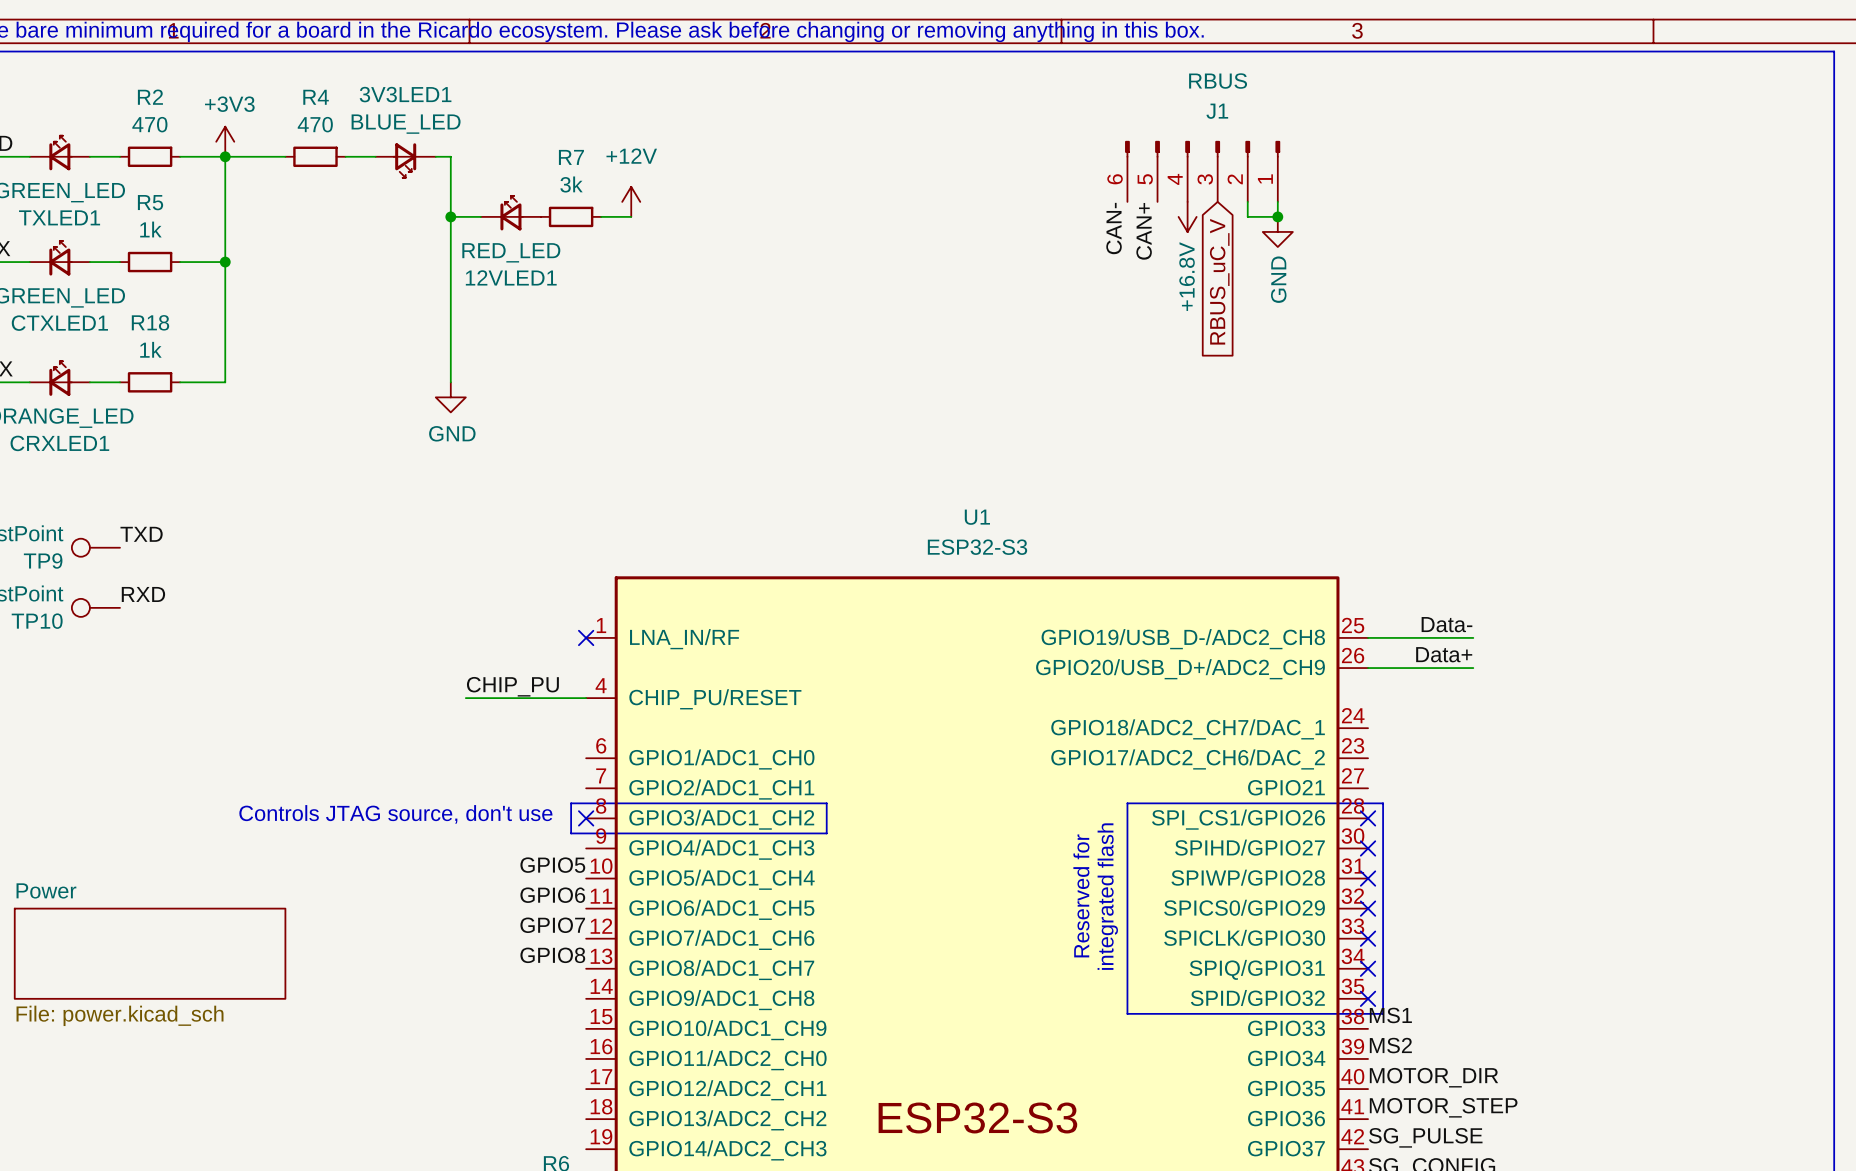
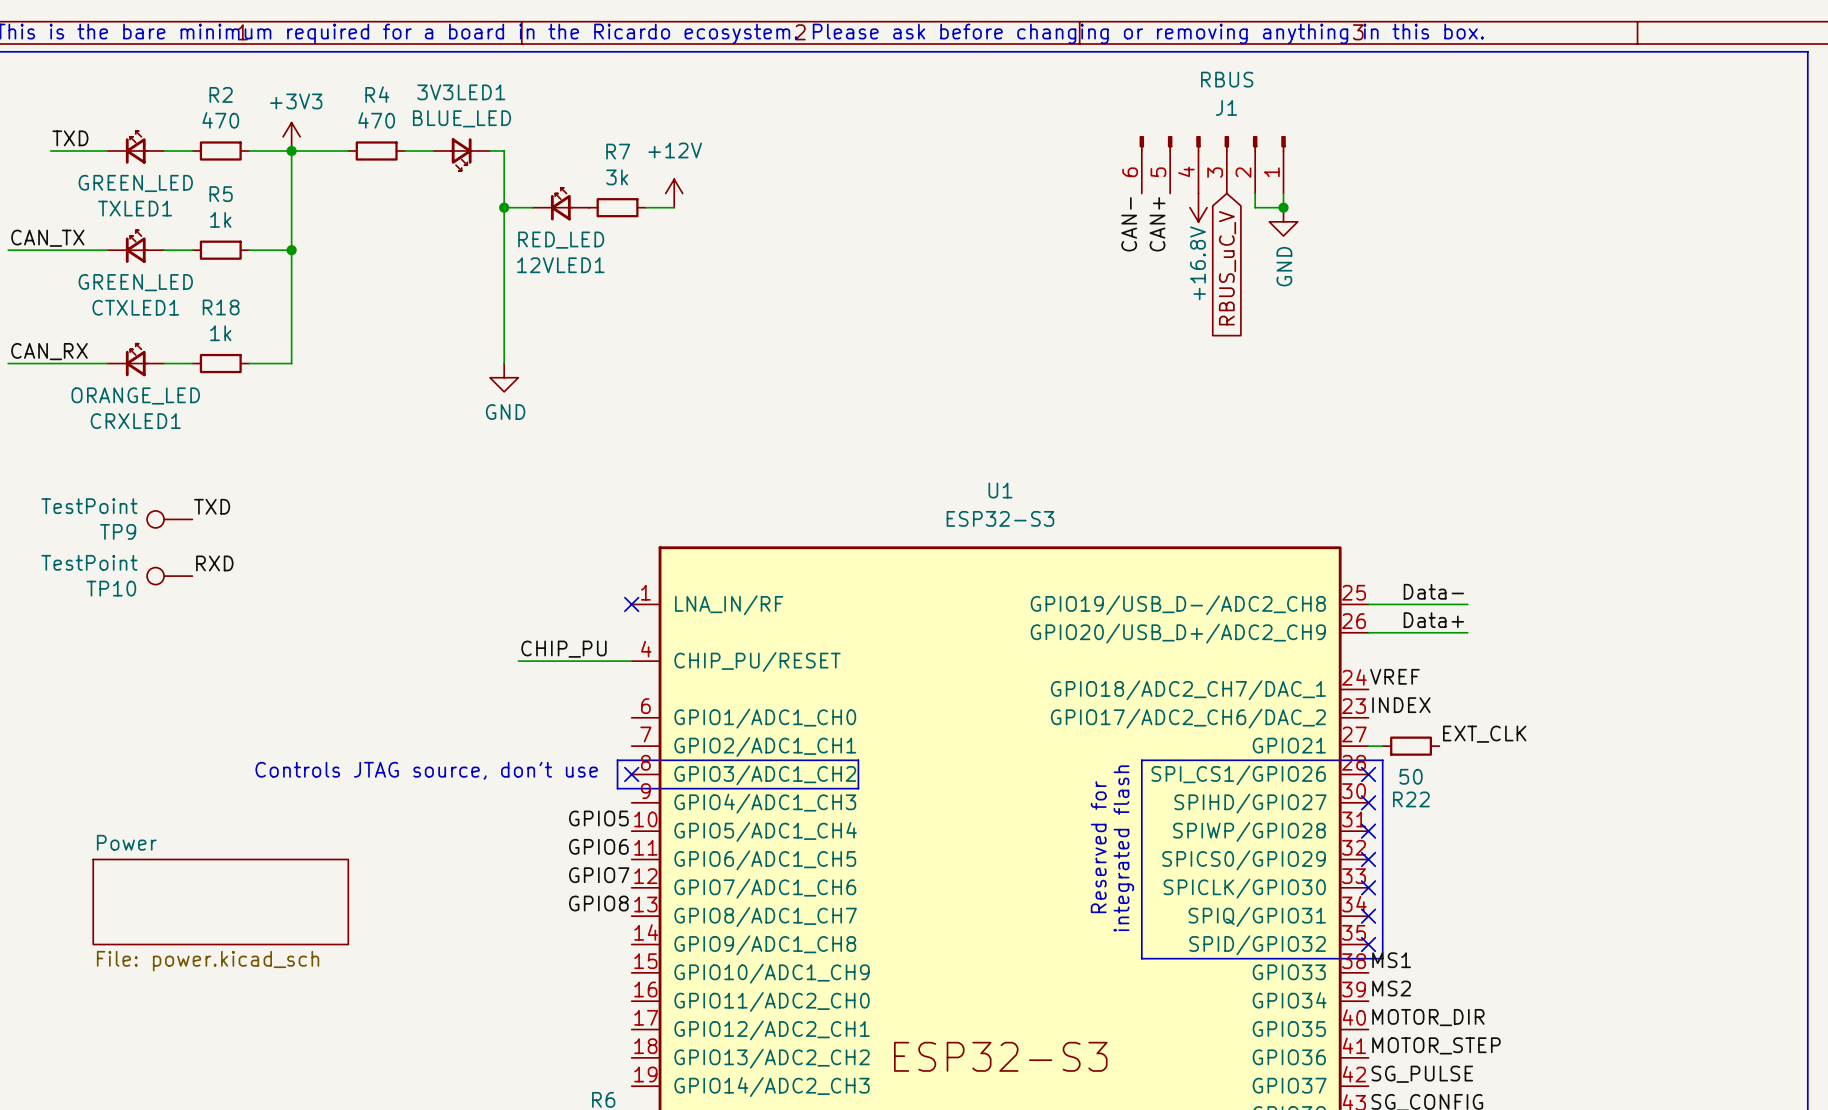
label: none -> VREF (1394, 676)
label: none -> INDEX (1401, 705)
label: none -> EXT_CLK (1484, 734)
wire: none -> (1368, 746) (1382, 746)
R22: none -> 50 (1411, 746)

